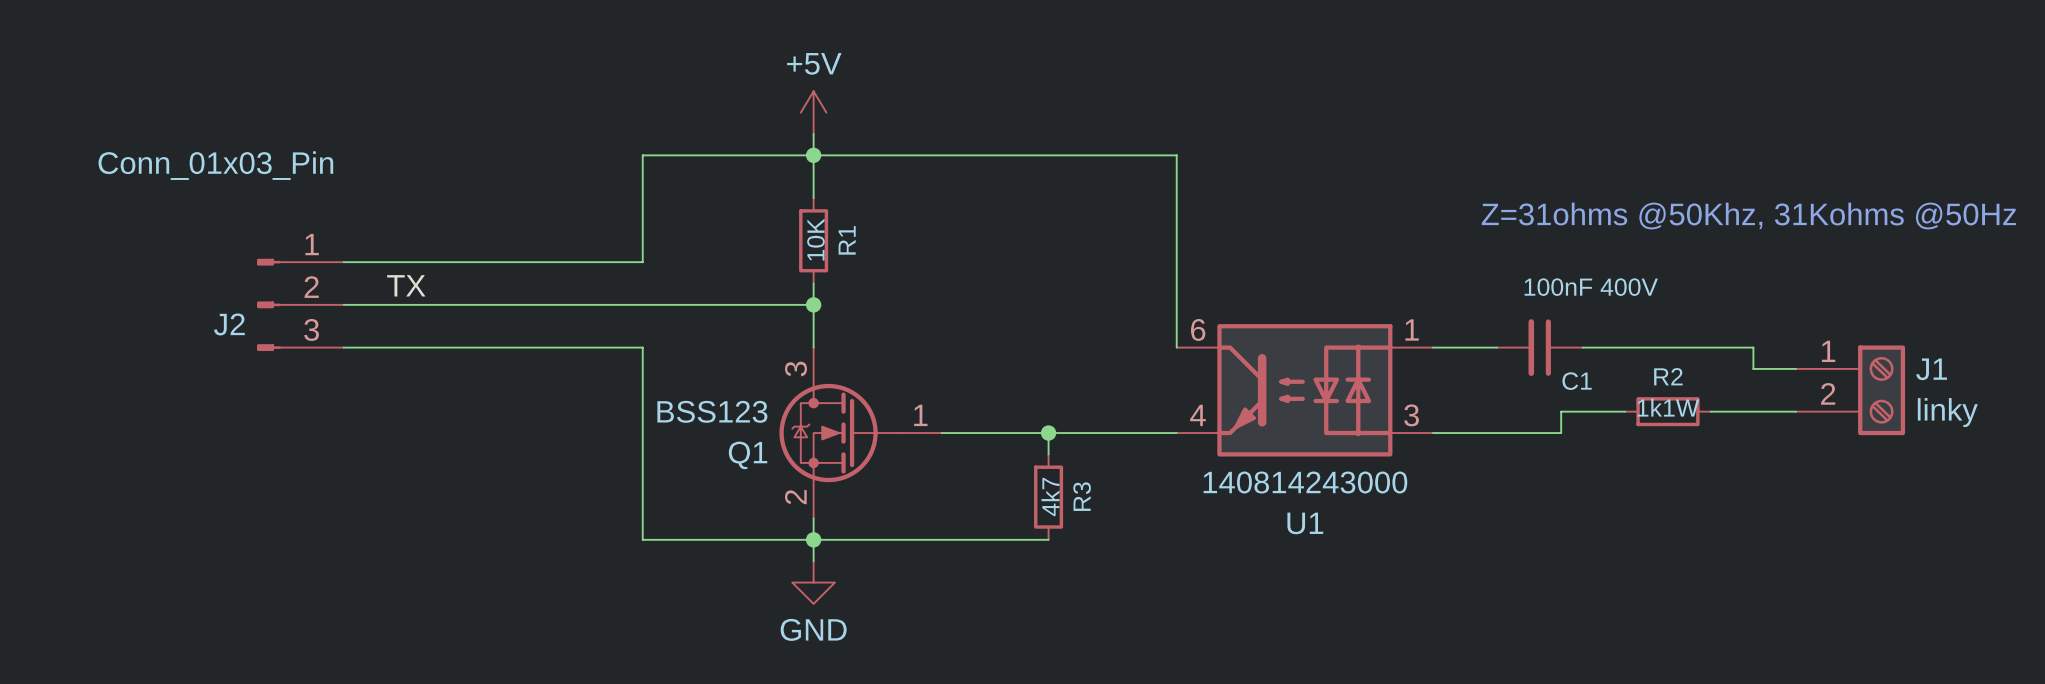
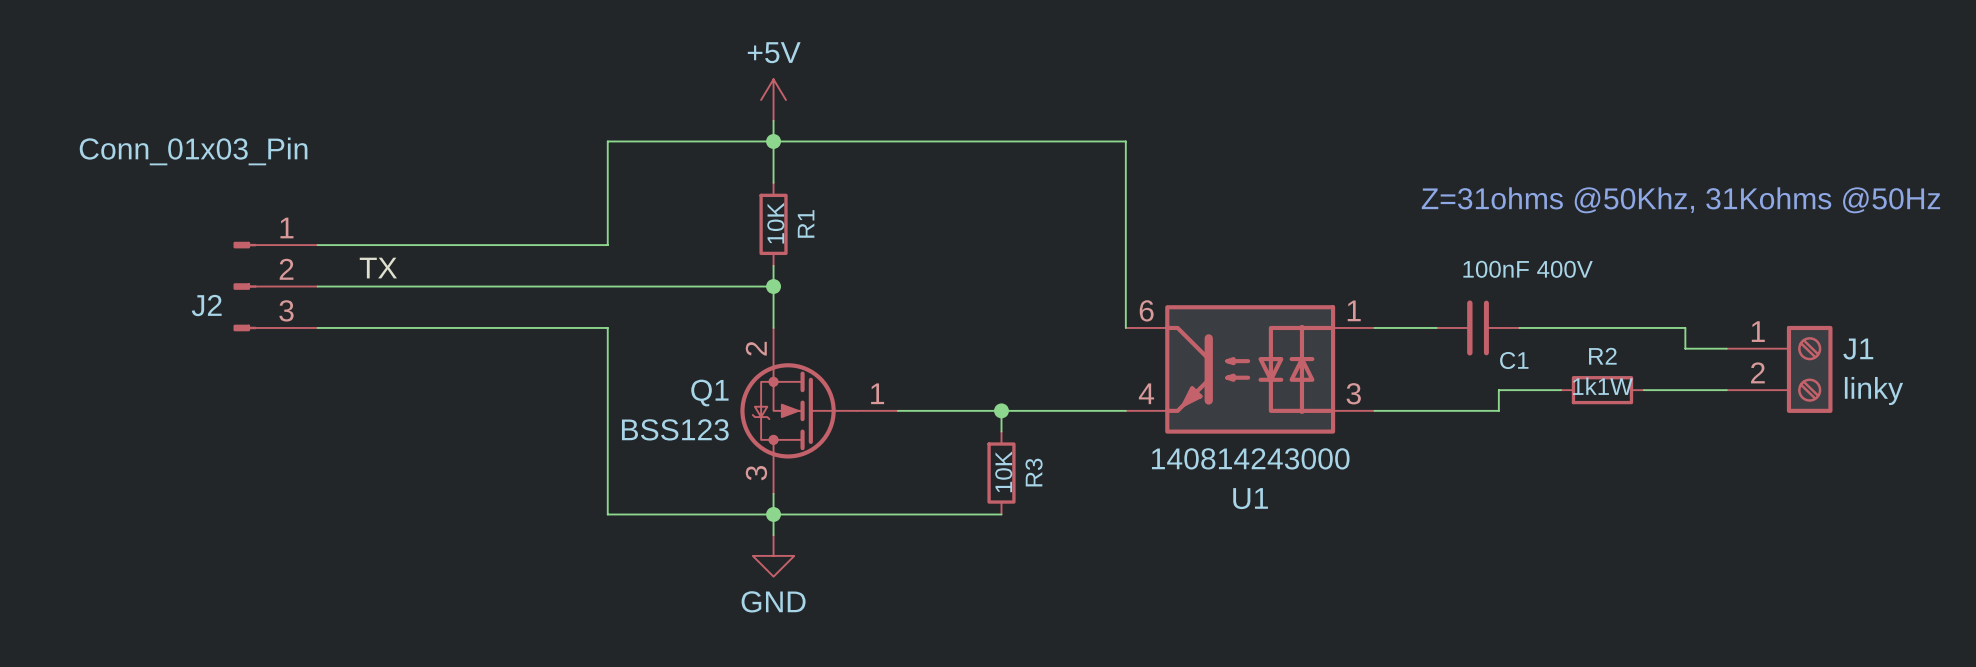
Q1 flip: as is (839, 433) -> up-down (798, 410)
R3 value: 4k7 (1050, 497) -> 10K (1003, 471)

